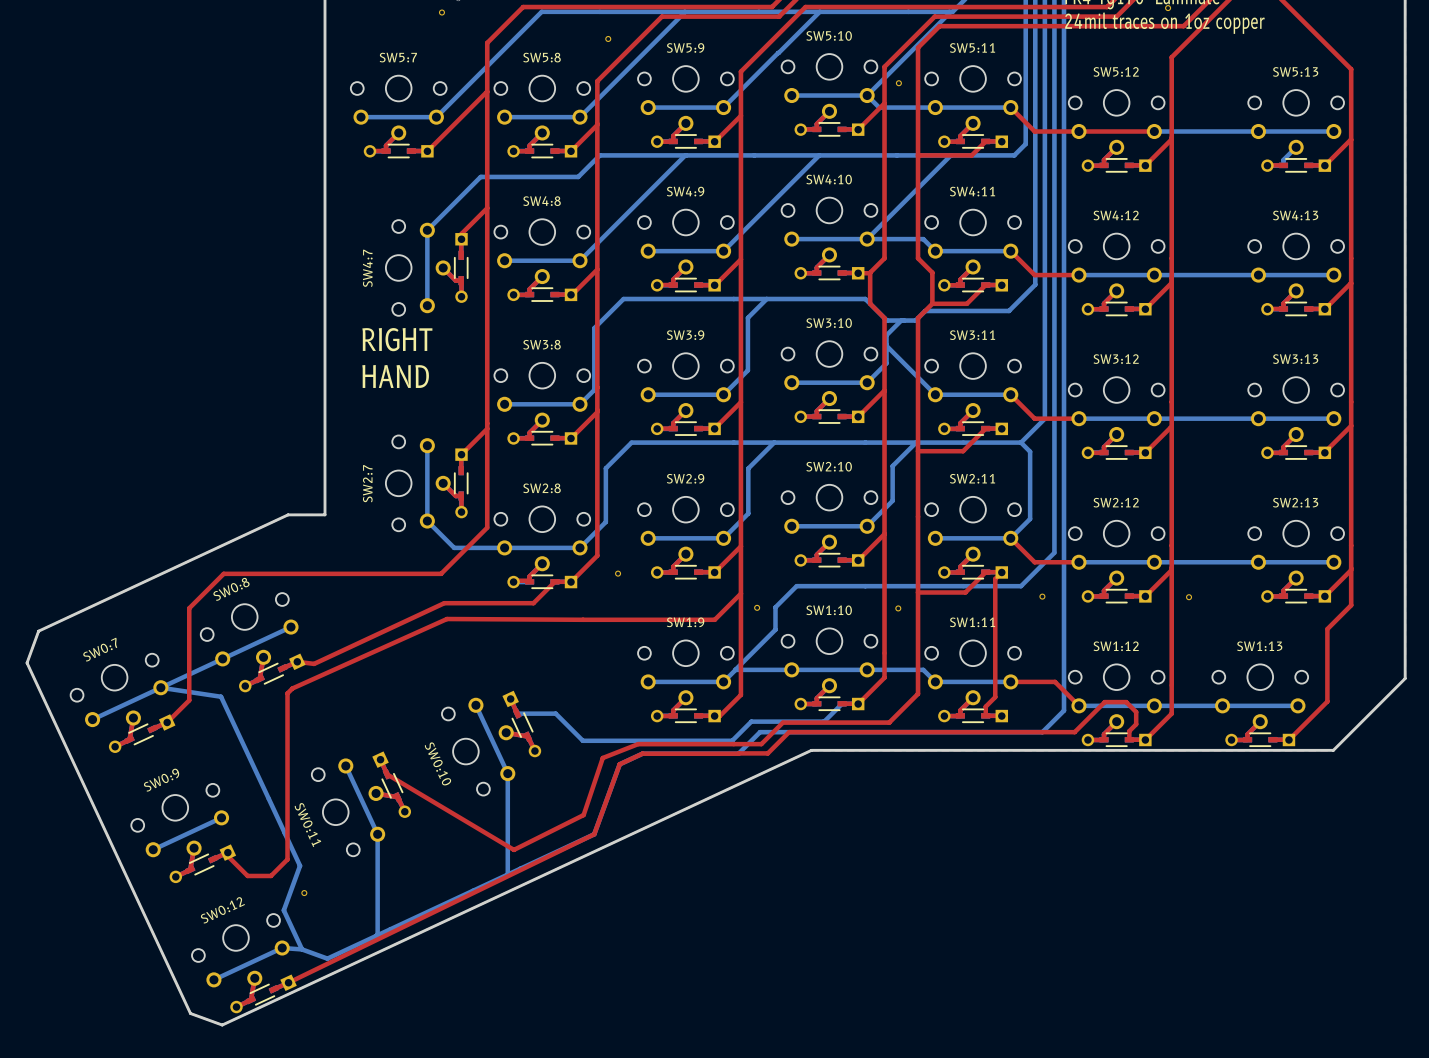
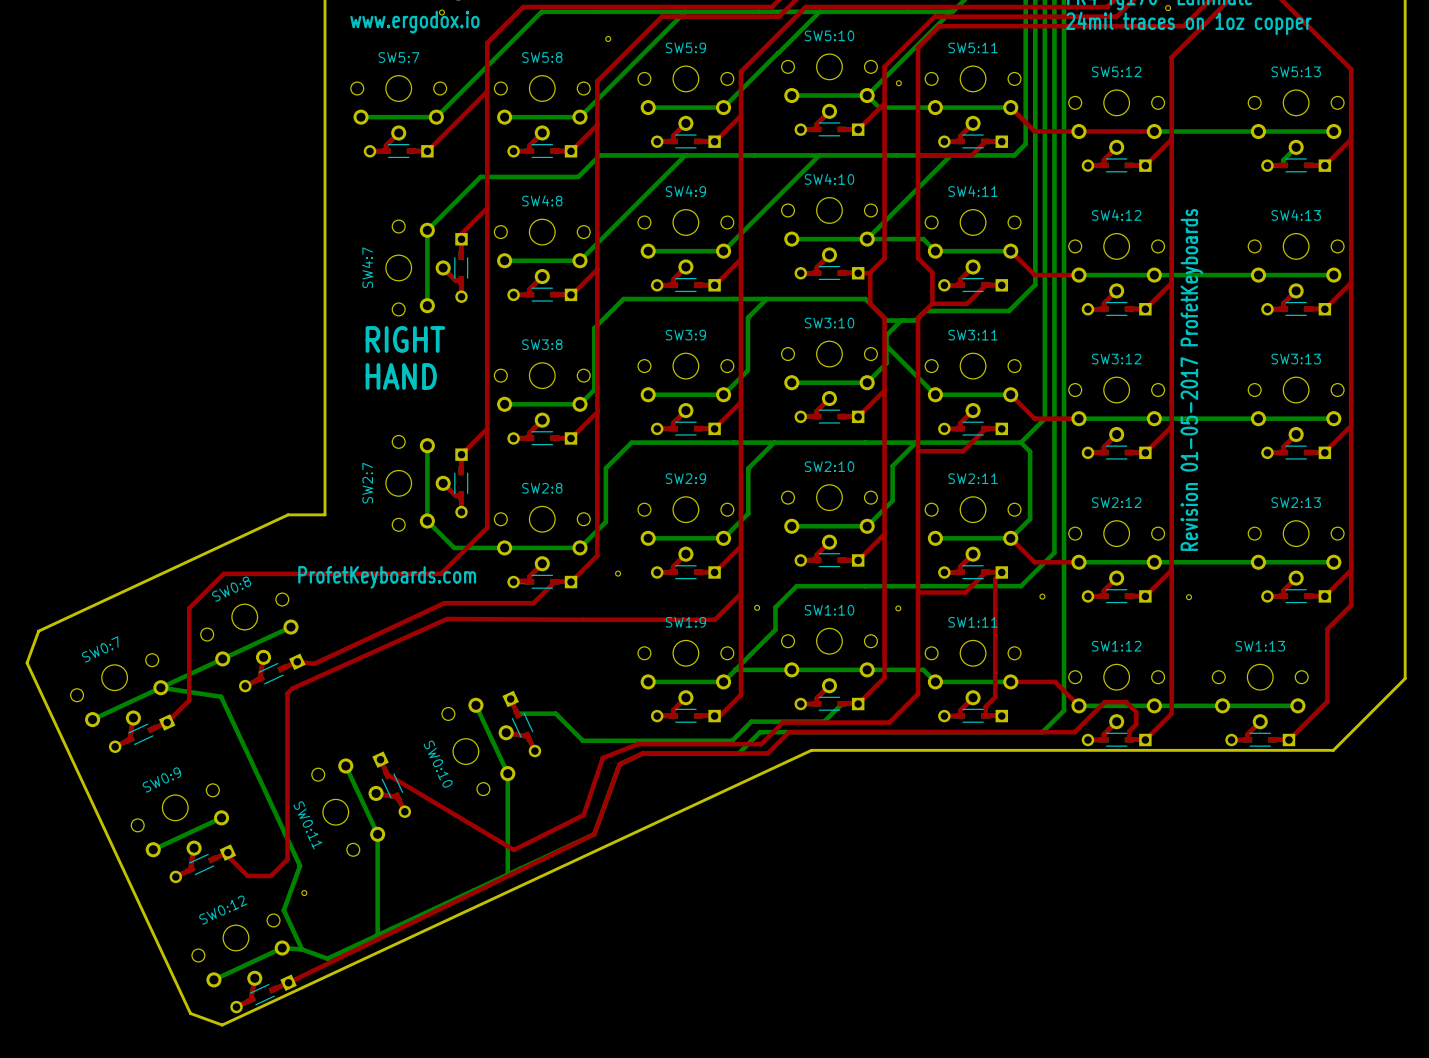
text: none -> www.ergodox.io (414, 22)
text: none -> Revision 01-05-2017 ProfetKeyboards (1191, 379)
text: none -> ProfetKeyboards.com (387, 577)

